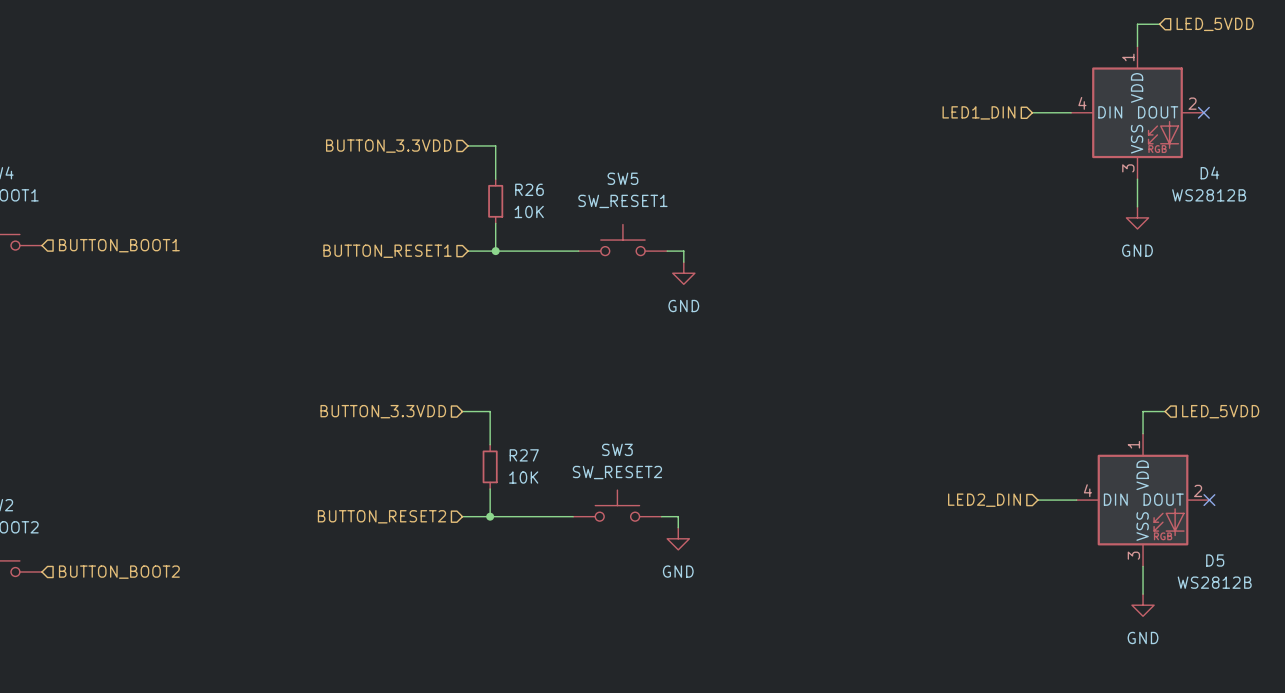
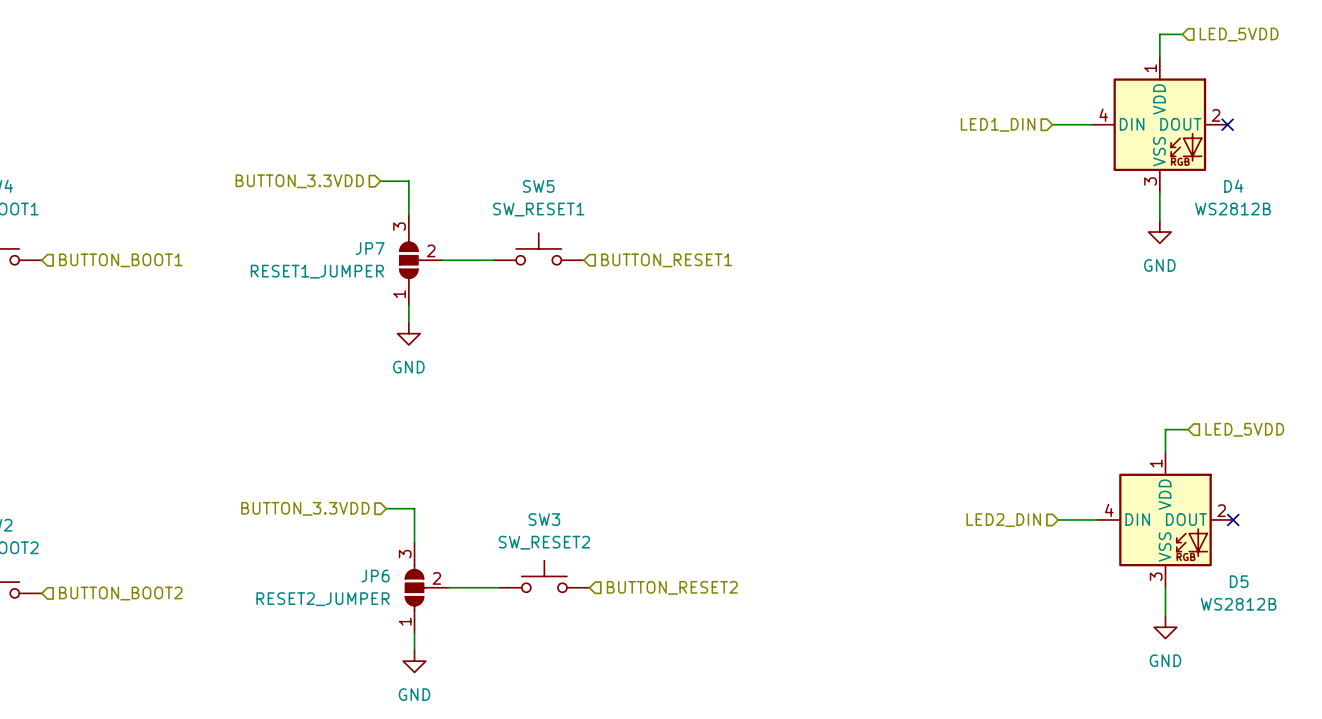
wire: (468, 145) (495, 145) (495, 179) -> (380, 181) (408, 181) (408, 215)
hierarchical label position: BUTTON_3.3VDD (388, 146) -> BUTTON_3.3VDD (299, 181)
R26: 10K (495, 201) -> none
wire: (495, 223) (495, 251) -> none
SW5 position: (622, 240) -> (538, 248)
JP7: none -> RESET1_JUMPER (421, 260)
wire: none -> (442, 260) (493, 260)
hierarchical label rotation: 0° (387, 251) -> 180° (666, 260)
hierarchical label position: BUTTON_RESET1 (387, 251) -> BUTTON_RESET1 (666, 260)
wire: (468, 251) (578, 251) -> none
junction: (495, 251) -> none
wire: (667, 251) (683, 251) (683, 262) -> none
power symbol: GND (683, 273) -> none
wire: none -> (408, 305) (408, 322)
power symbol: none -> GND (408, 333)
hierarchical label position: BUTTON_3.3VDD (383, 411) -> BUTTON_3.3VDD (305, 508)
wire: (462, 411) (490, 411) (490, 444) -> (386, 508) (414, 508) (414, 542)
R27: 10K (490, 466) -> none
wire: (490, 489) (490, 516) -> none
SW3 position: (617, 505) -> (544, 576)
hierarchical label rotation: 0° (381, 516) -> 180° (672, 587)
hierarchical label position: BUTTON_RESET2 (381, 516) -> BUTTON_RESET2 (672, 587)
wire: (462, 516) (573, 516) -> none
junction: (490, 516) -> none
wire: (661, 516) (678, 516) (678, 527) -> none
power symbol: GND (678, 538) -> none
JP6: none -> RESET2_JUMPER (426, 587)
wire: none -> (448, 587) (499, 587)
wire: none -> (414, 632) (414, 649)
power symbol: none -> GND (414, 661)

